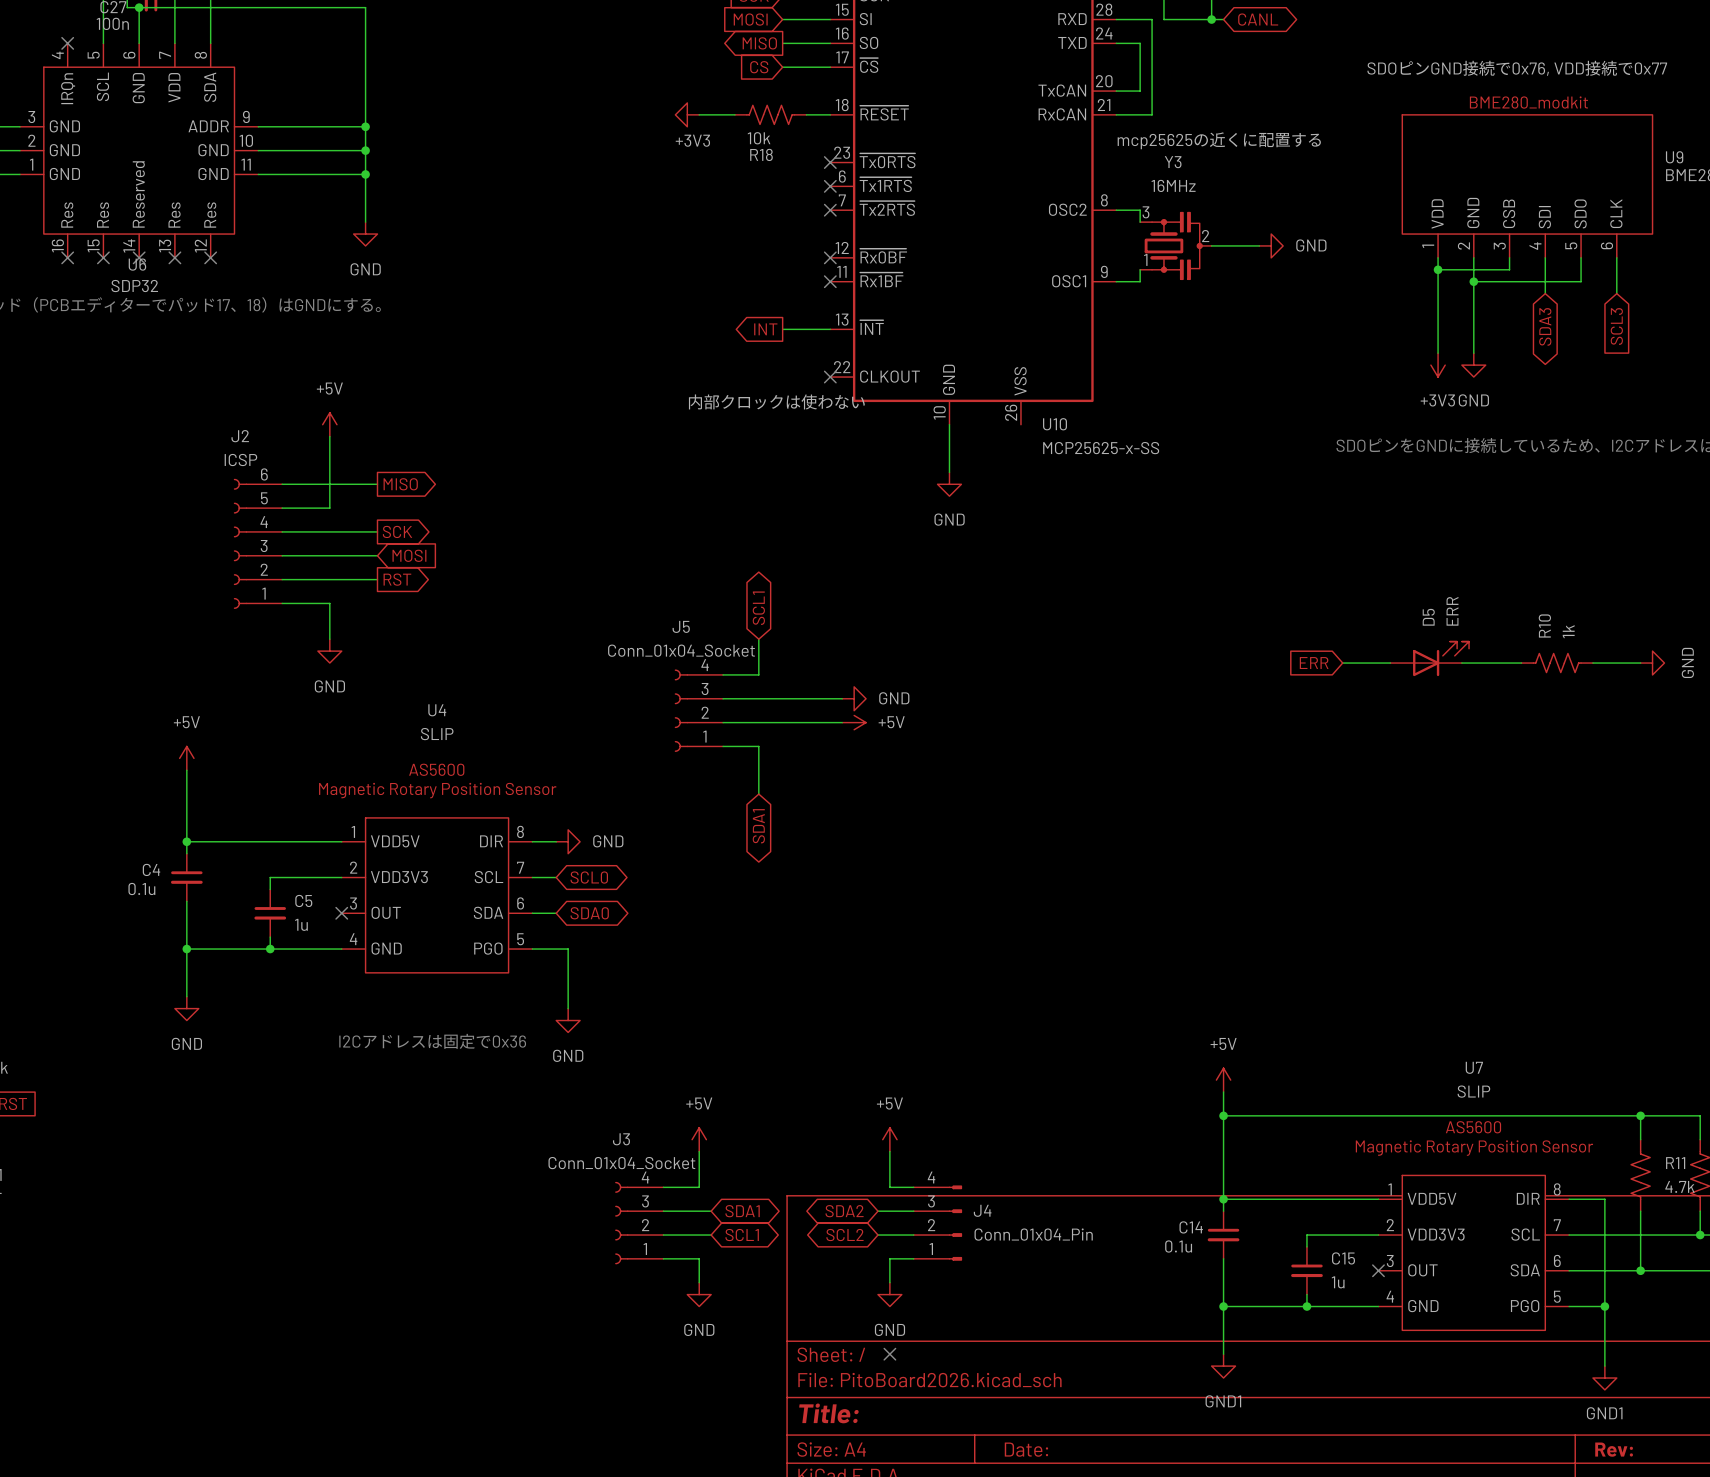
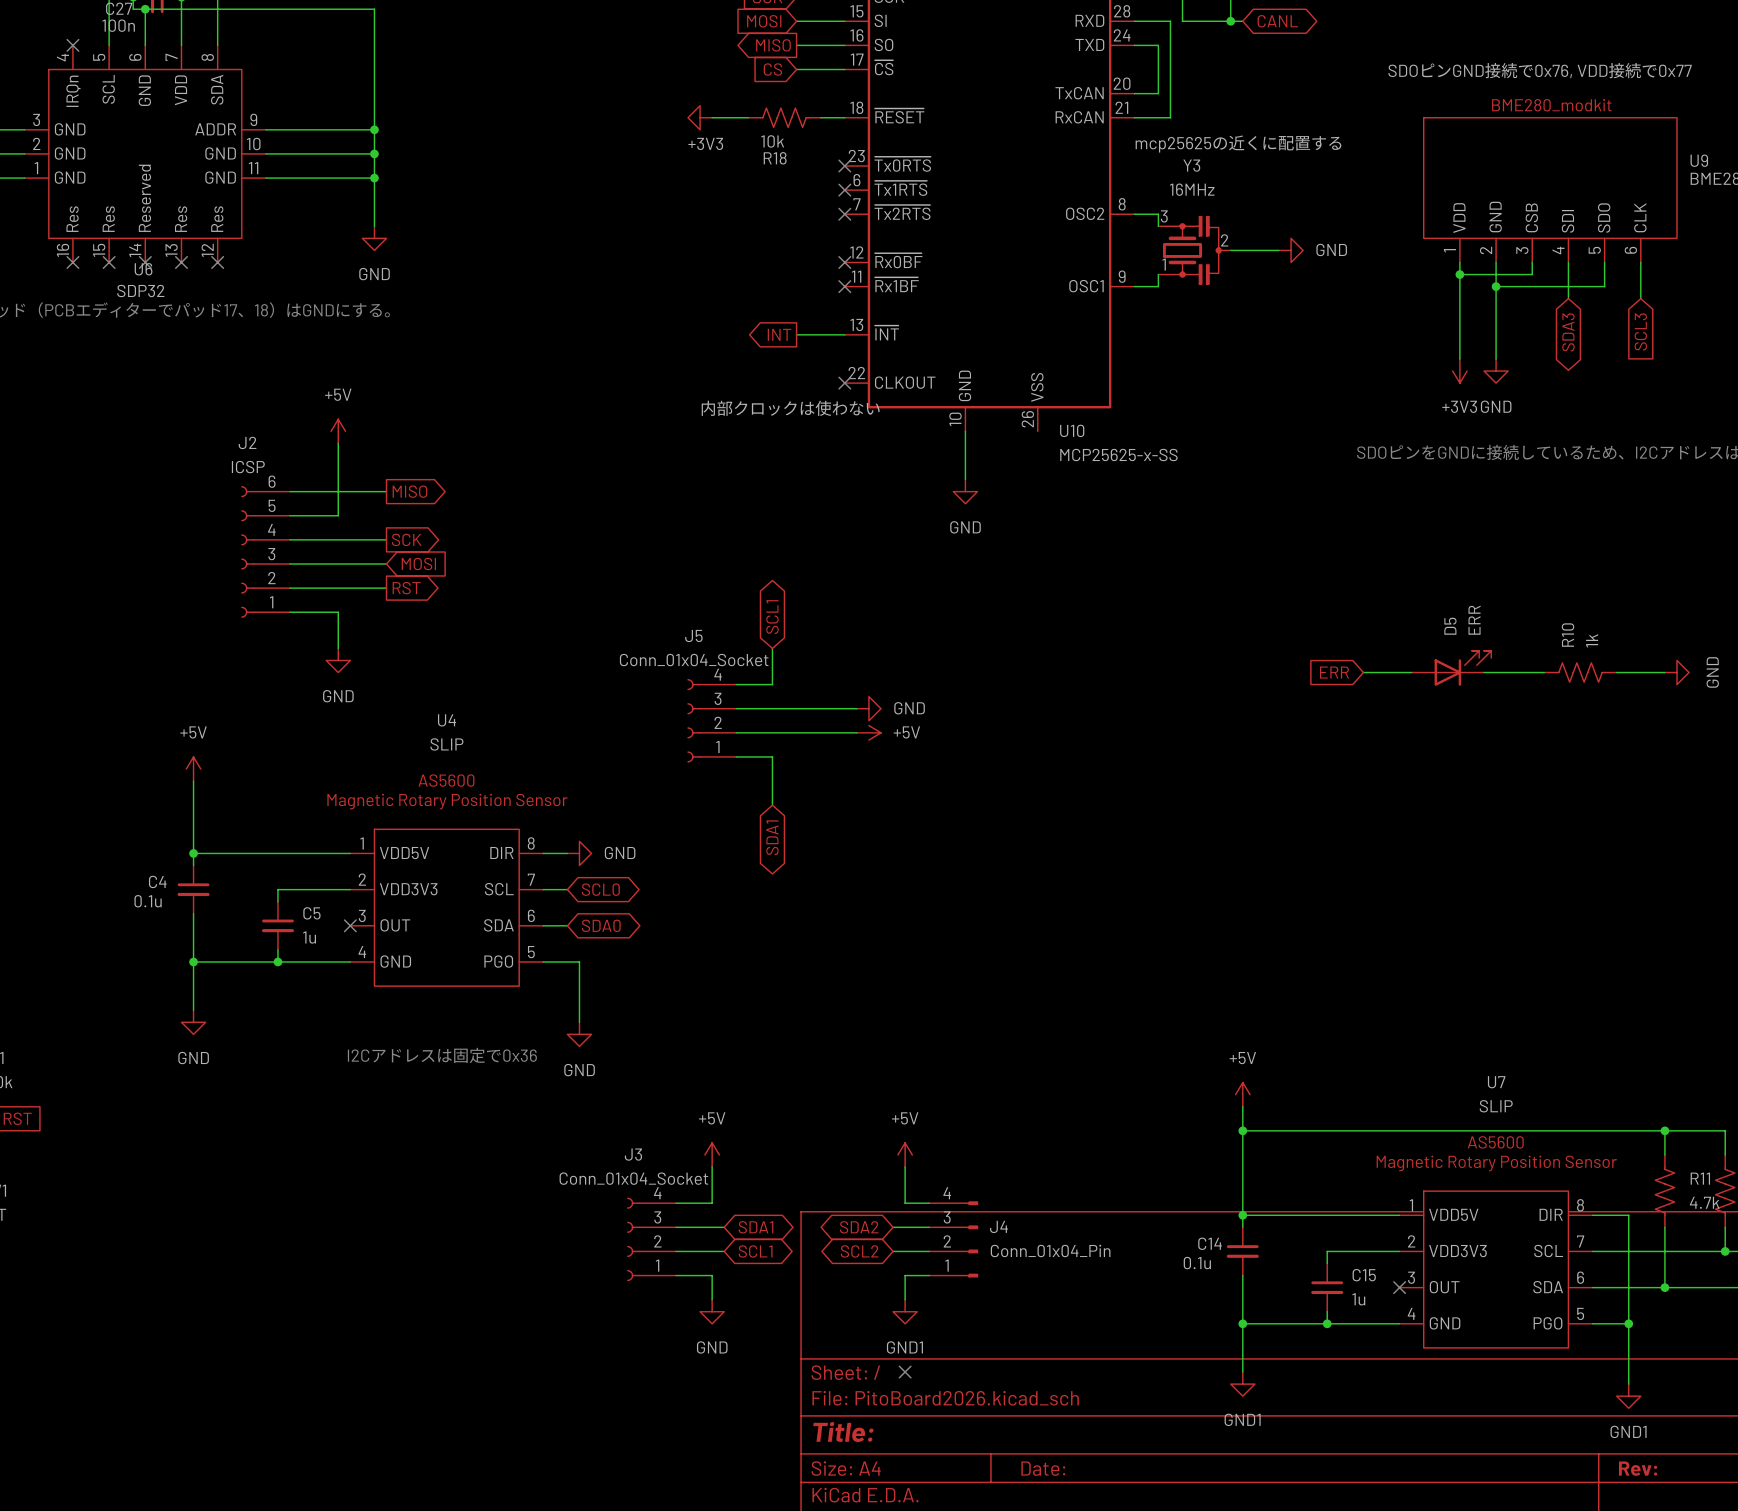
power symbol: GND (889, 1294) -> GND1 (905, 1311)

